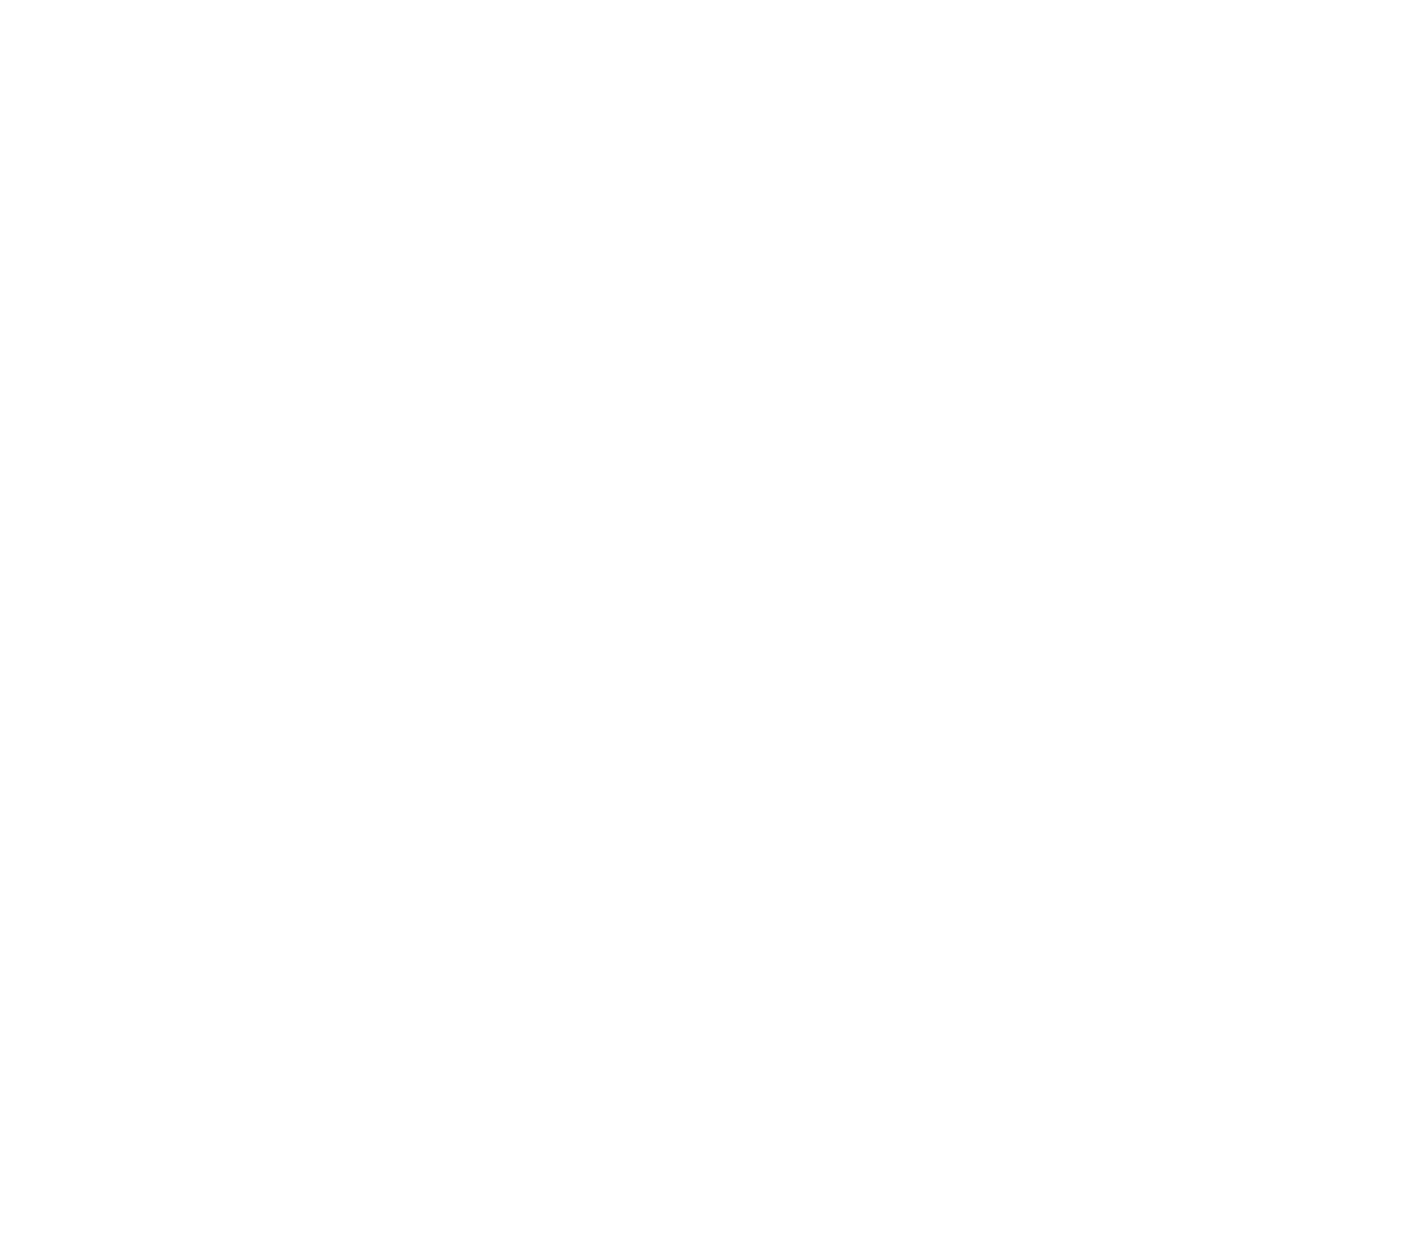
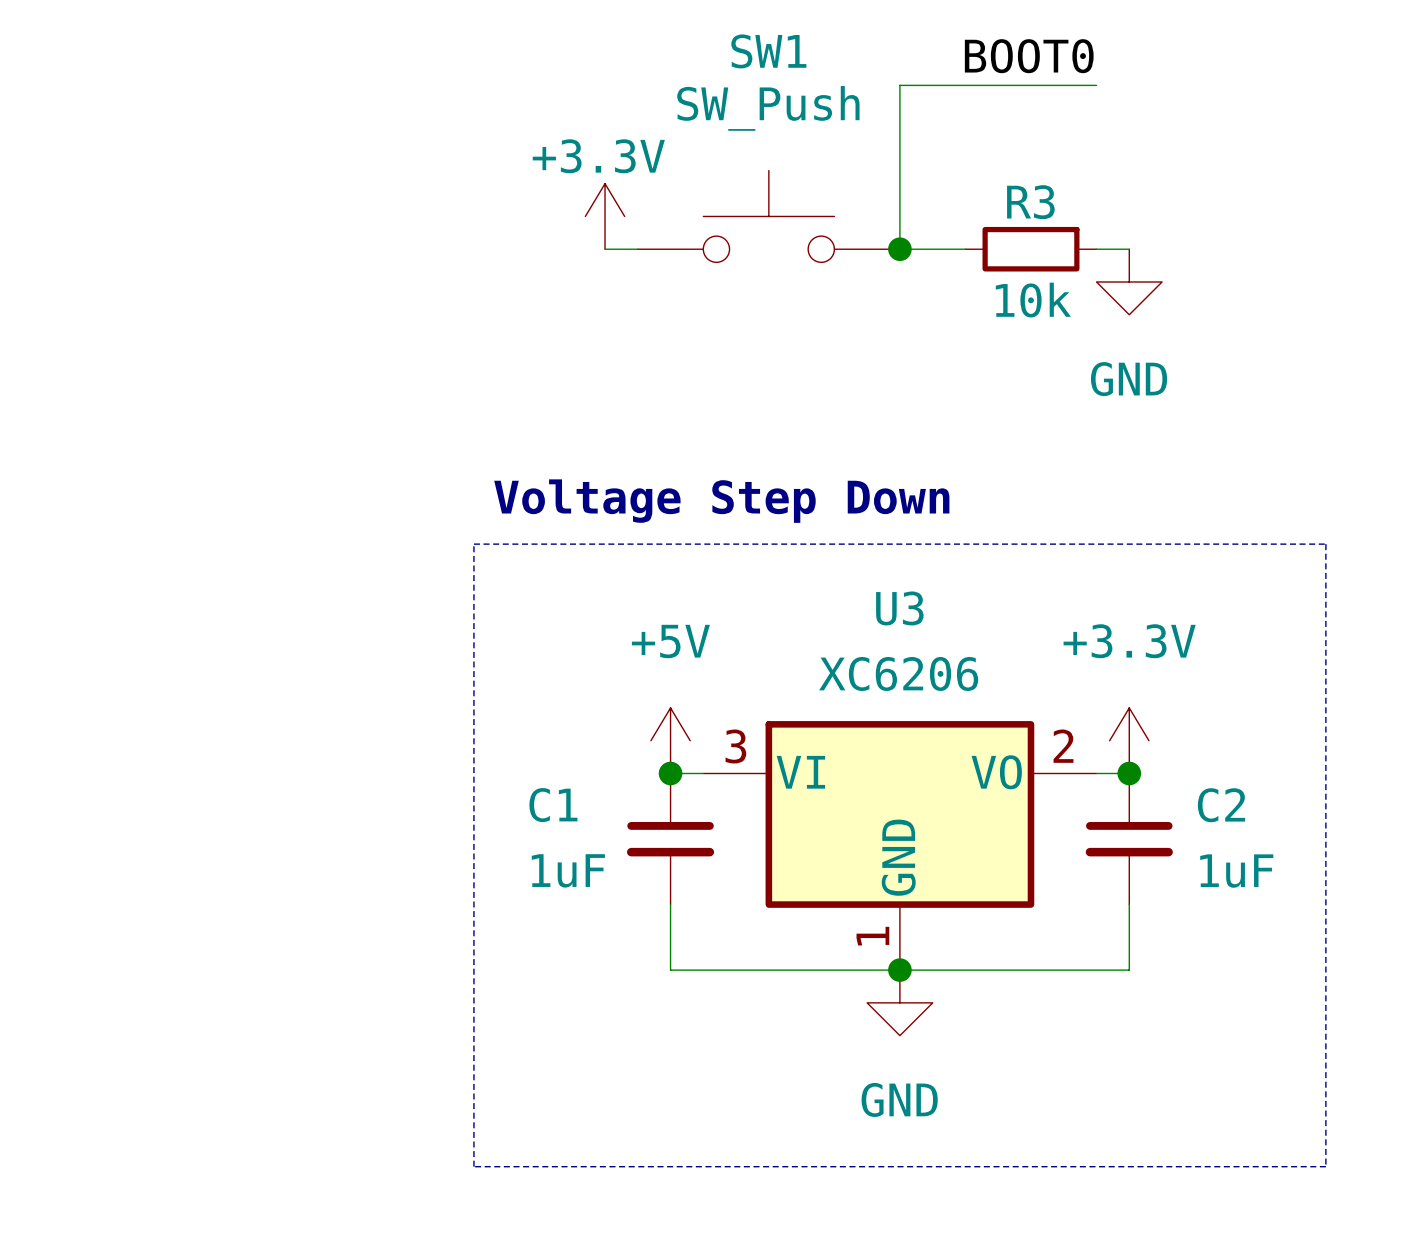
label: none -> BOOT0 (1029, 56)
wire: none -> (1096, 85) (899, 85) (899, 249) (965, 249)
power symbol: none -> +3.3V (605, 216)
SW1: none -> SW_Push (768, 216)
wire: none -> (605, 249) (637, 249)
junction: none -> (899, 249)
R3: none -> 10k (1030, 249)
wire: none -> (1096, 249) (1129, 249)
power symbol: none -> GND (1129, 281)
text: none -> Voltage Step Down (721, 501)
line: none -> (473, 544) (1325, 544) (1325, 1166) (473, 1166) (473, 544)
power symbol: none -> +5V (670, 740)
power symbol: none -> +3.3V (1129, 740)
wire: none -> (670, 773) (703, 773)
junction: none -> (670, 773)
wire: none -> (1096, 773) (1129, 773)
junction: none -> (1129, 773)
C1: none -> 1uF (670, 839)
C2: none -> 1uF (1129, 839)
U3: none -> XC6206 (899, 845)
wire: none -> (670, 904) (670, 970) (1129, 970) (1129, 904)
junction: none -> (899, 970)
power symbol: none -> GND (899, 1002)

